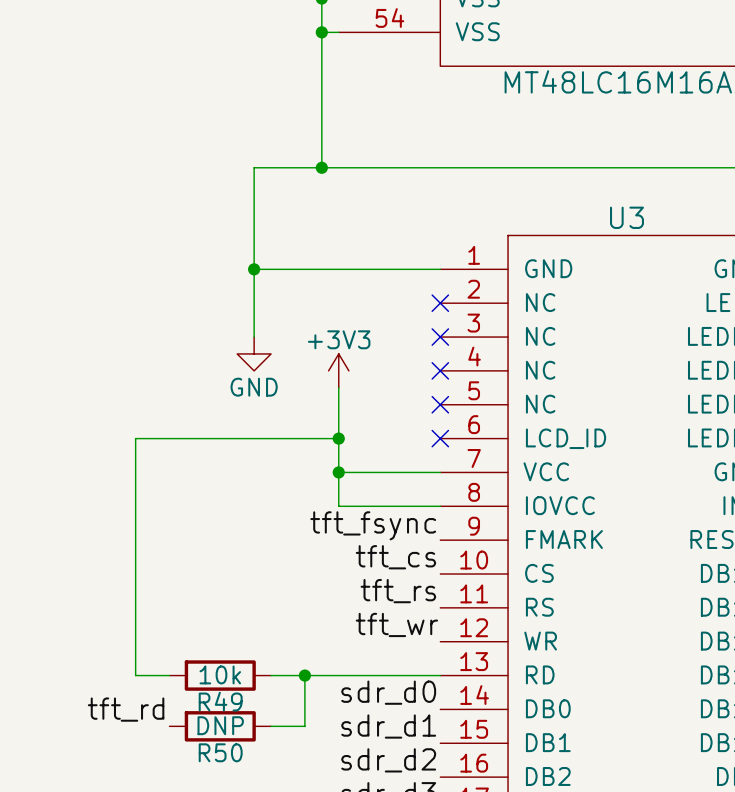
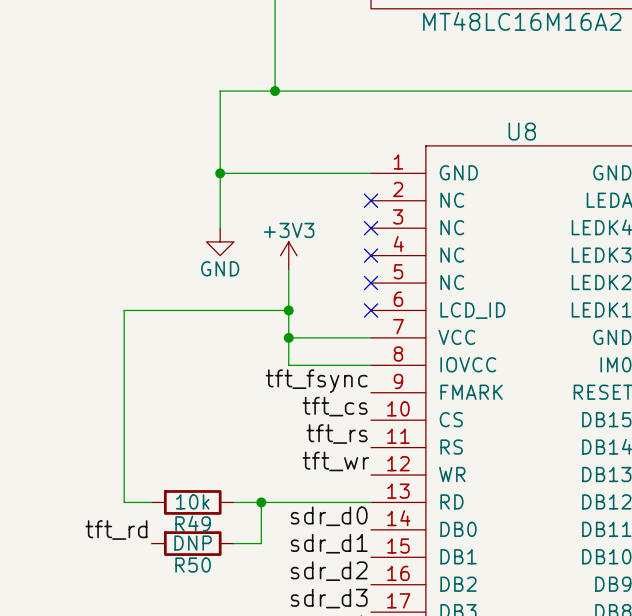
U3 name: U3 (626, 217) -> U8 (522, 131)

